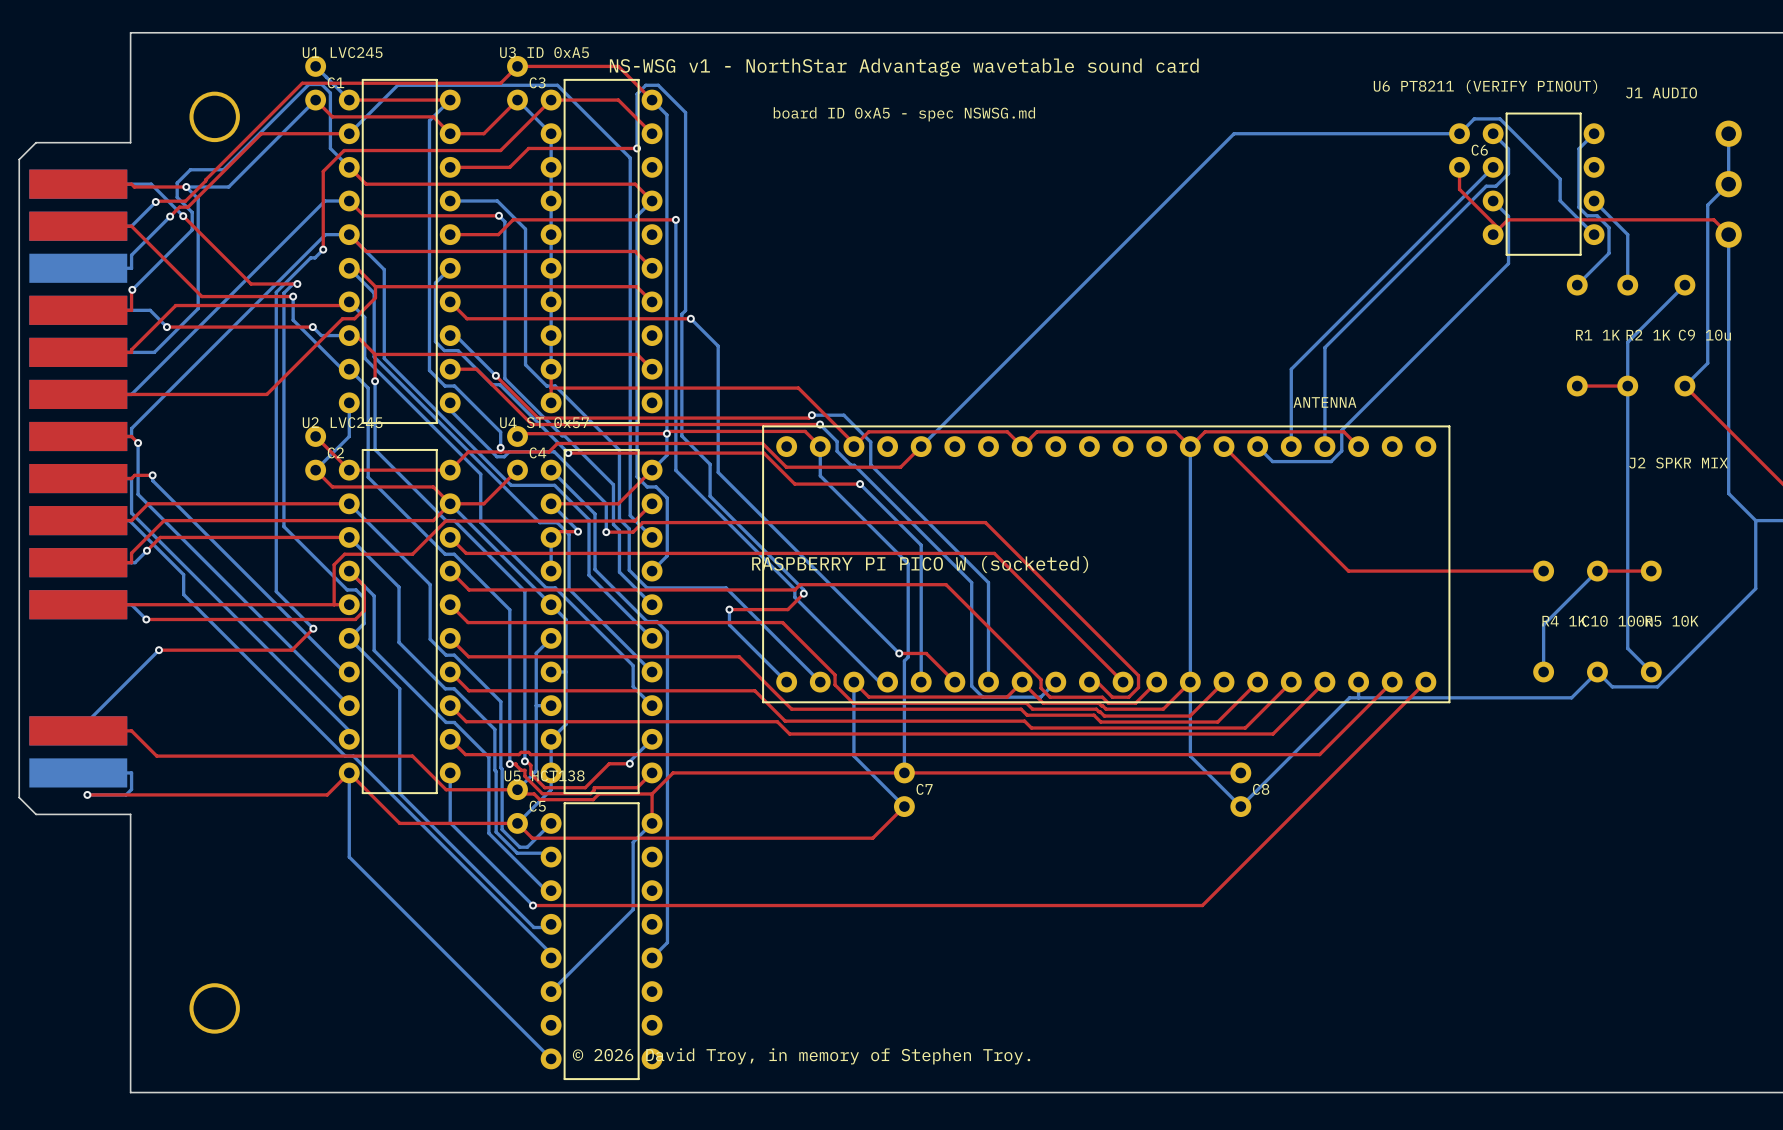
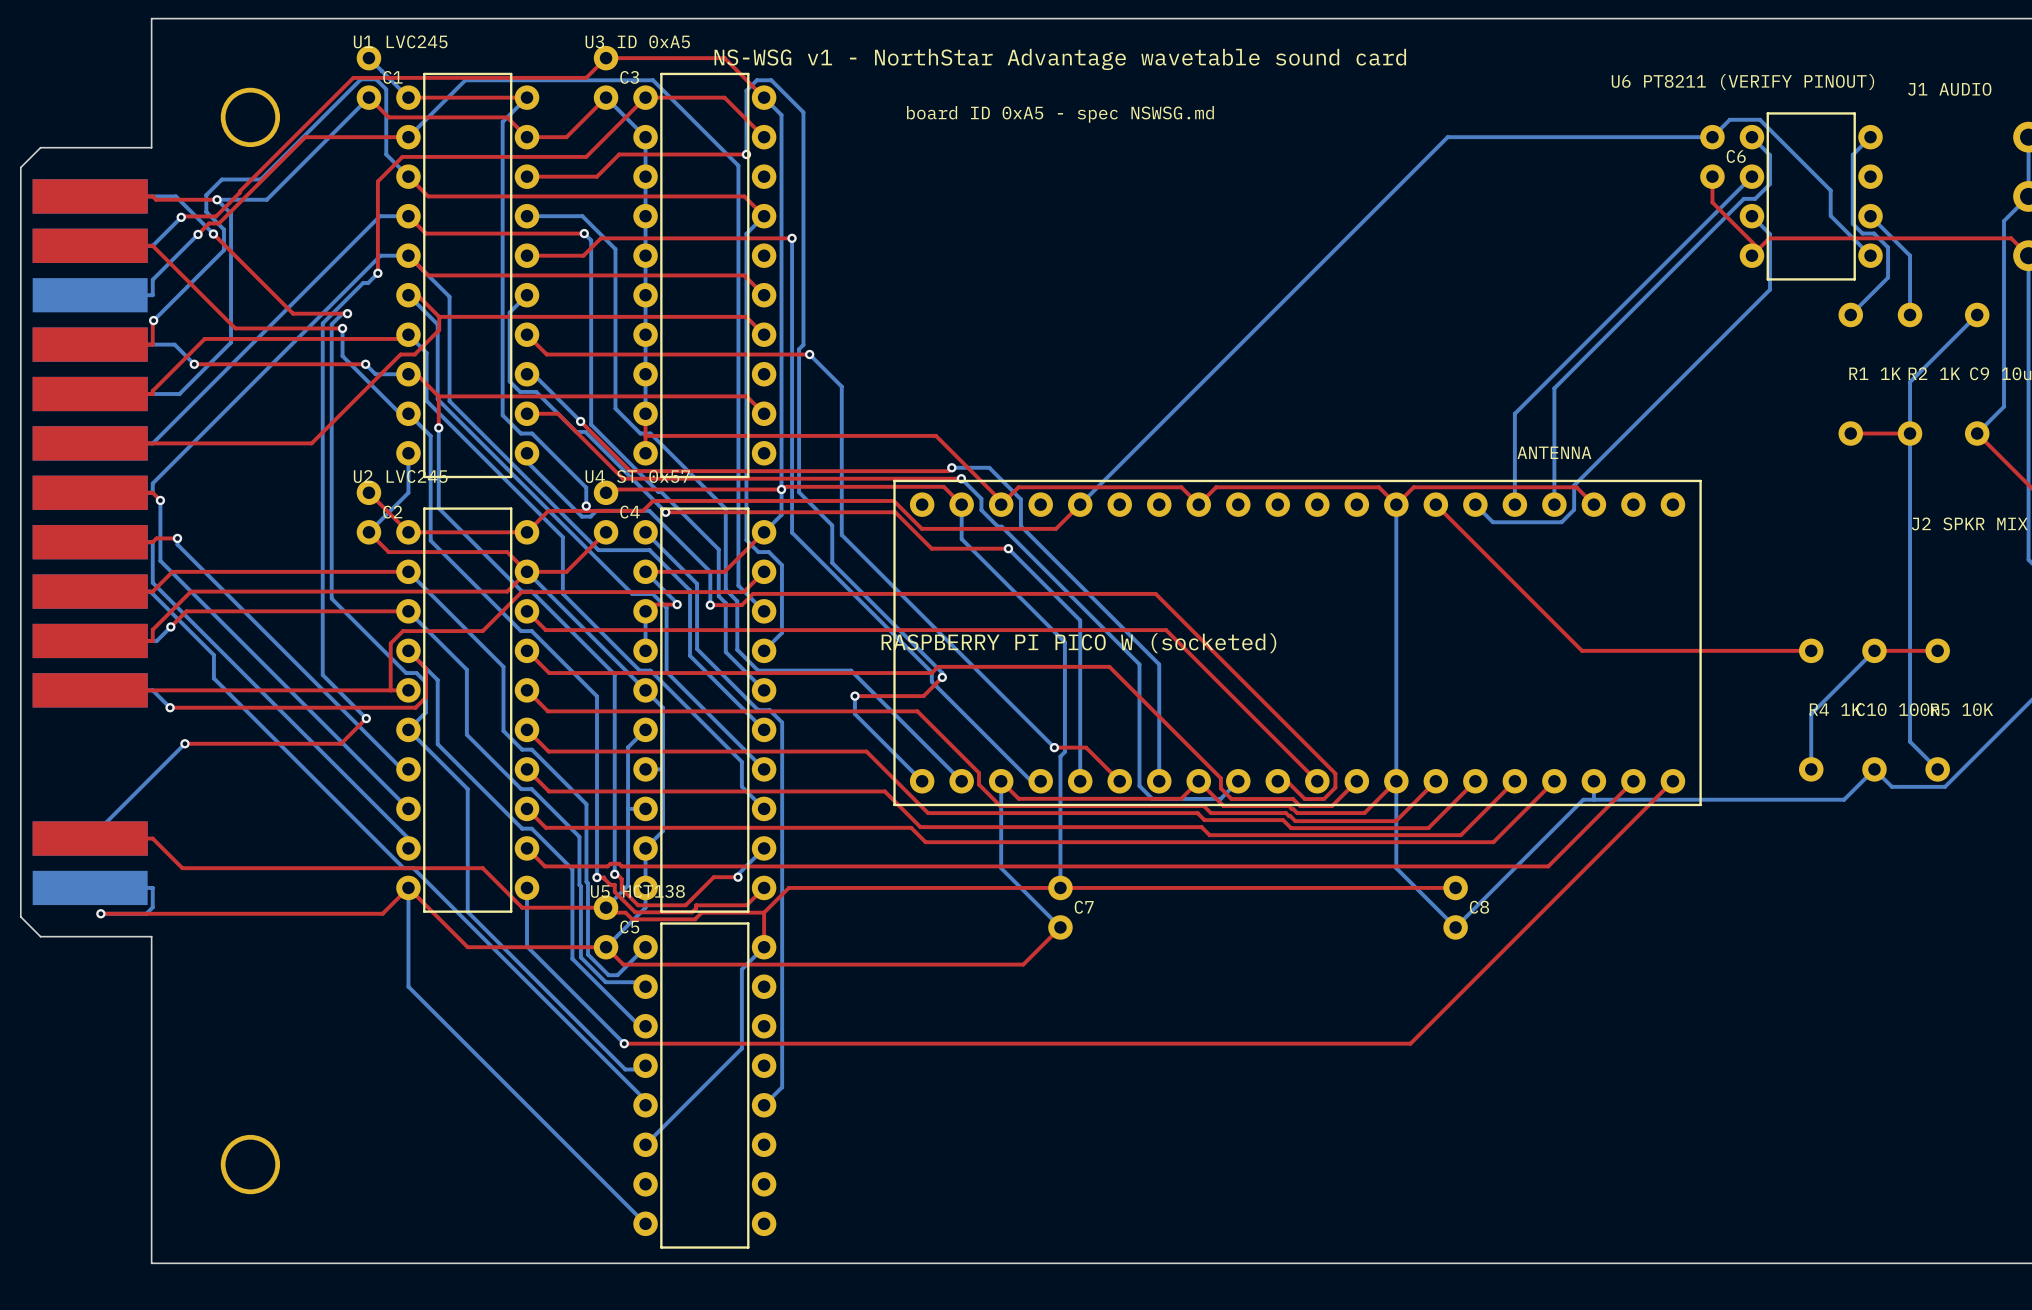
text: © 2026 David Troy, in memory of Stephen Troy. (801, 1056) -> none

